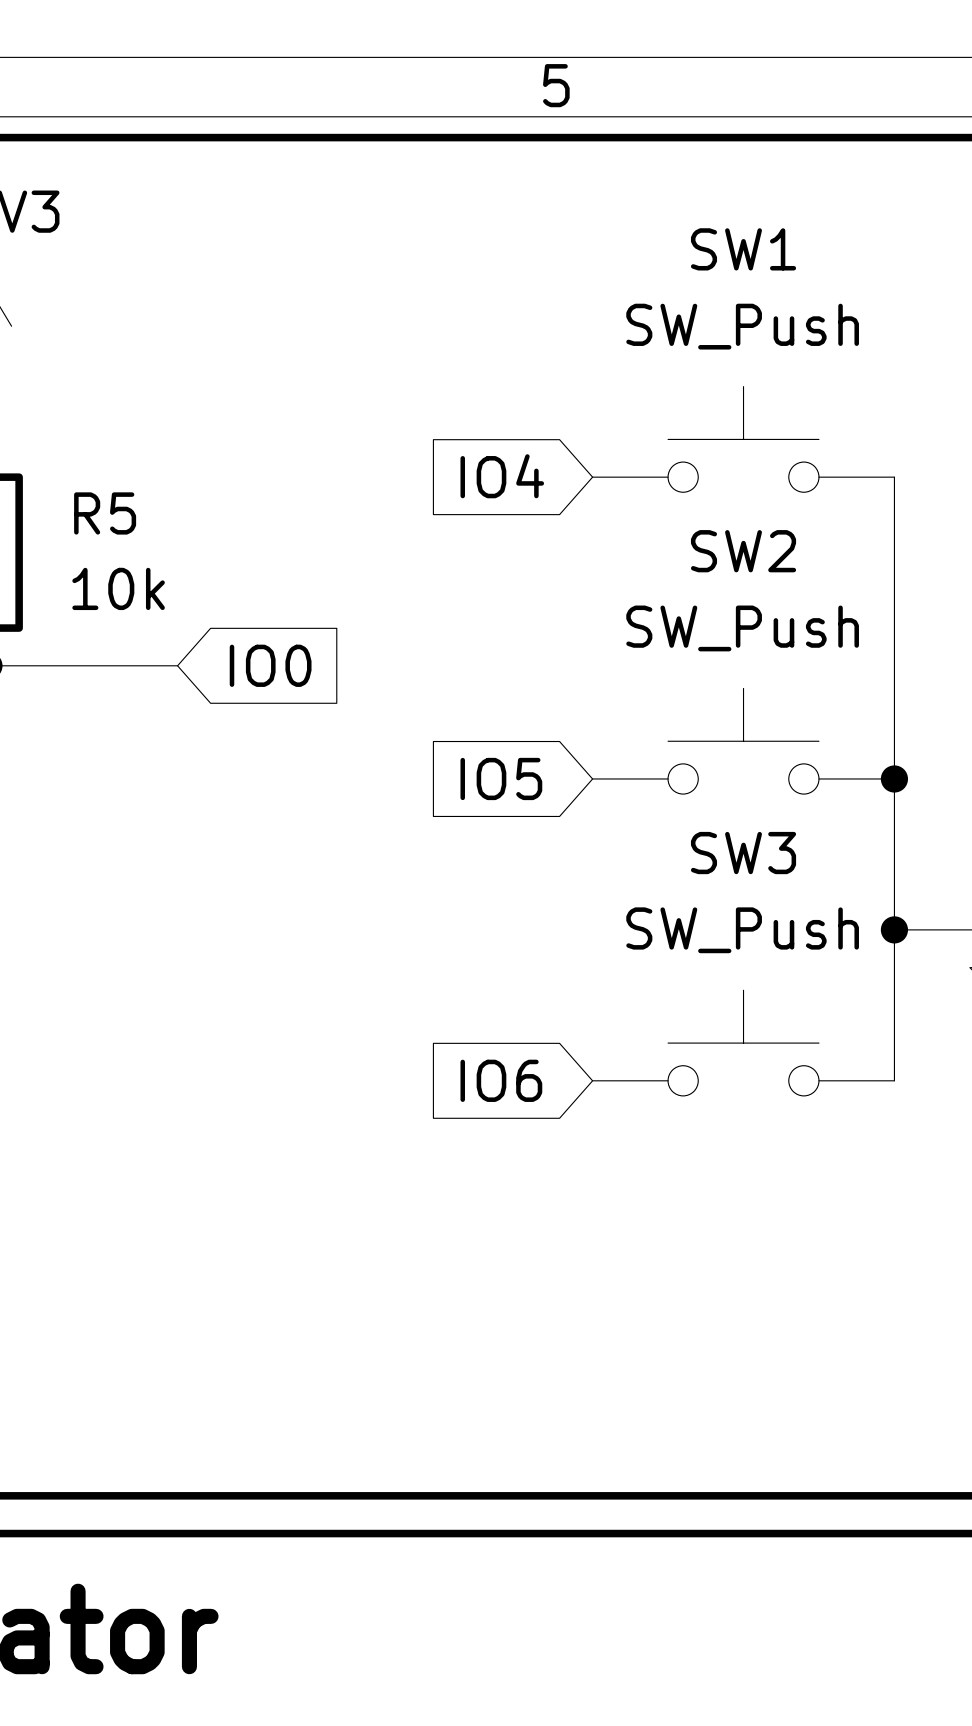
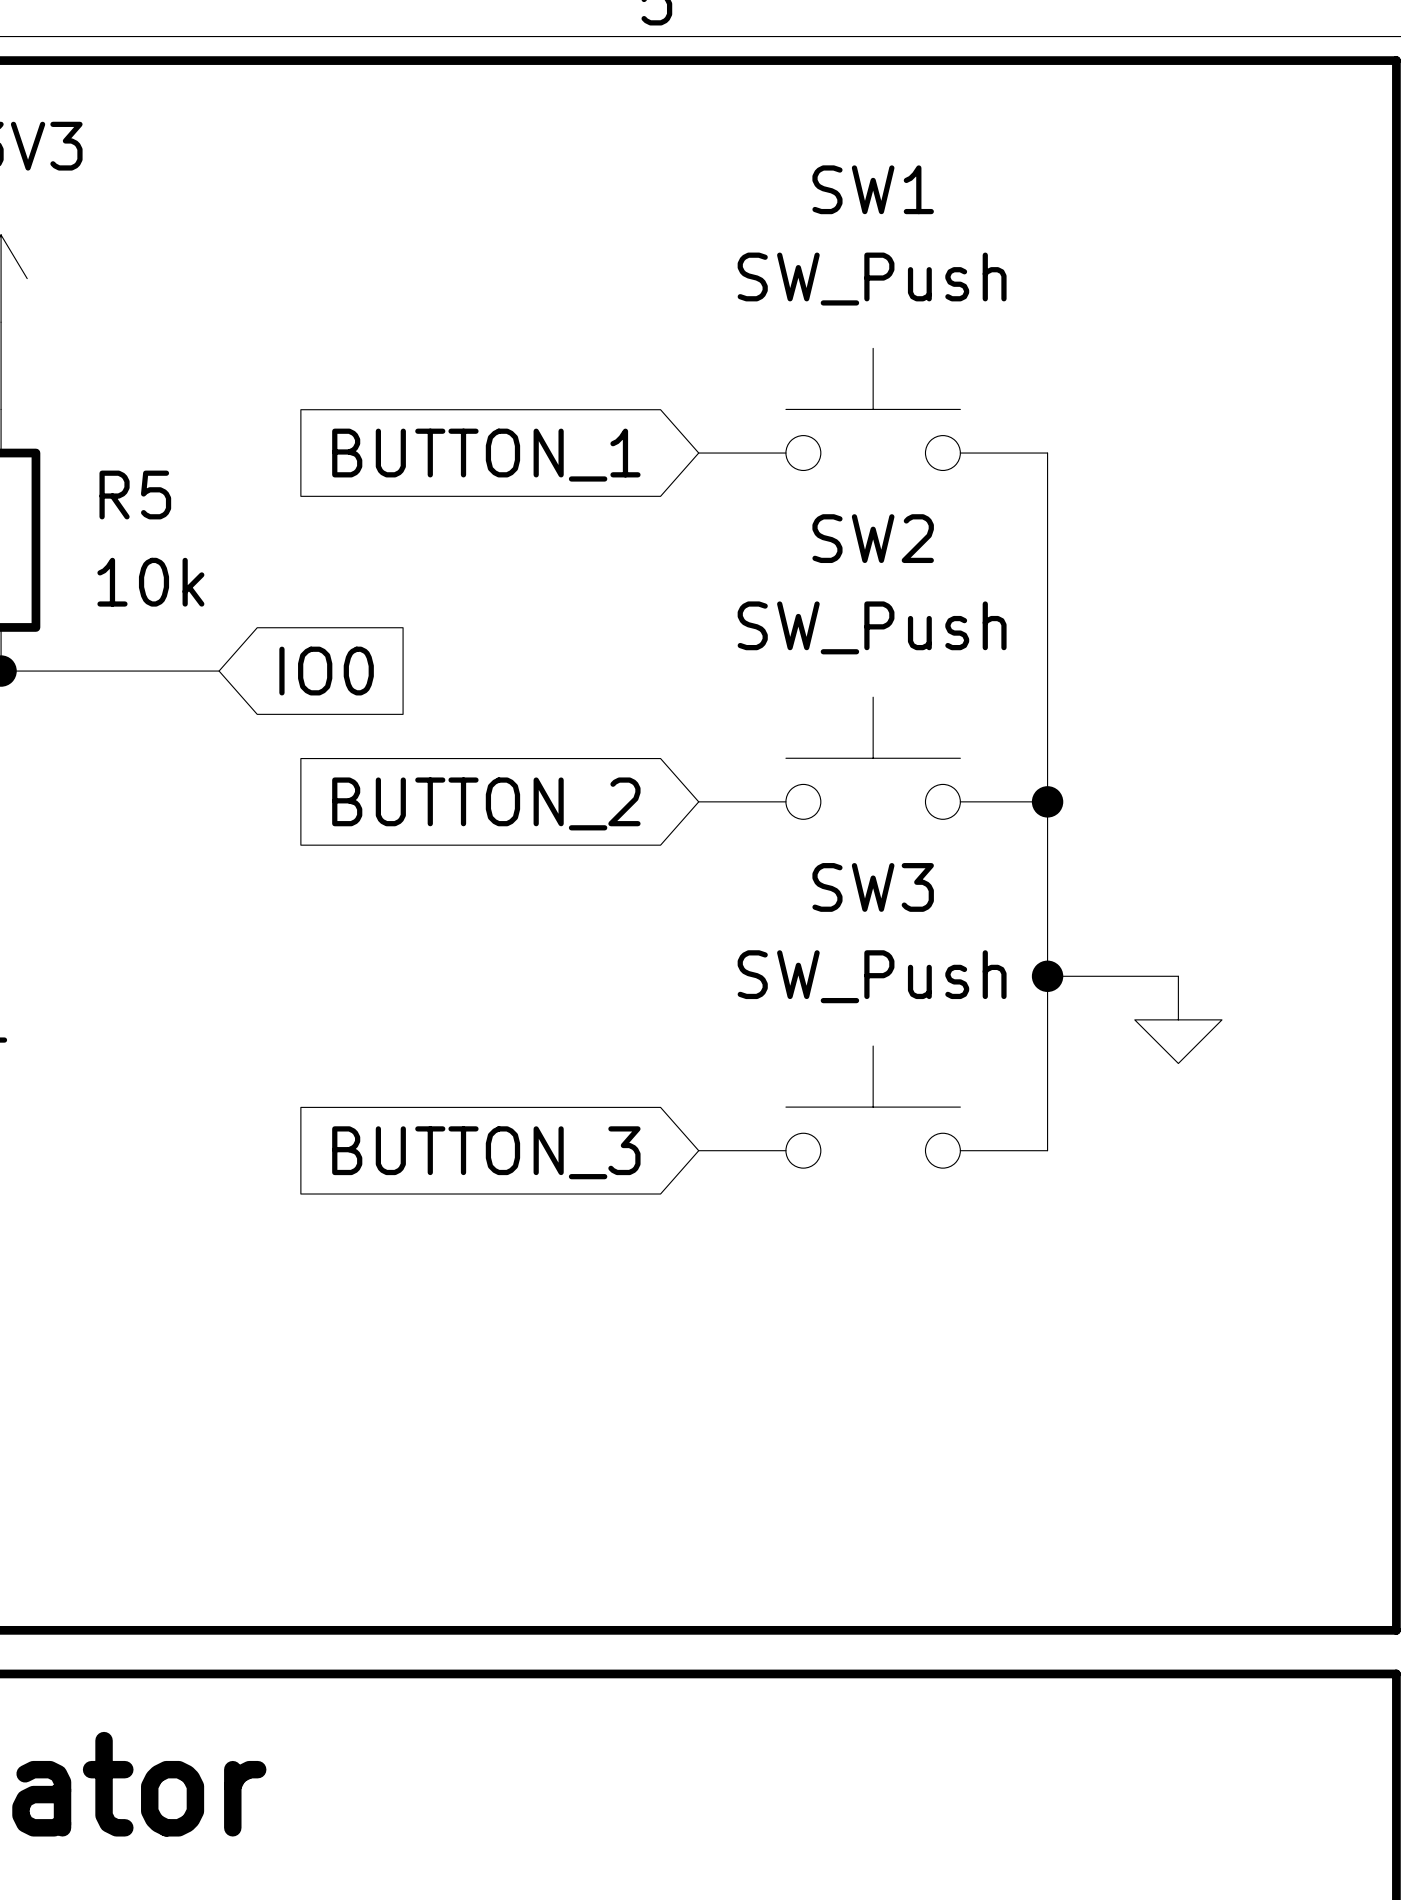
global label: IO4 (502, 476) -> BUTTON_1 (486, 455)
global label: IO5 (501, 778) -> BUTTON_2 (486, 803)
global label: IO6 (501, 1080) -> BUTTON_3 (486, 1152)

